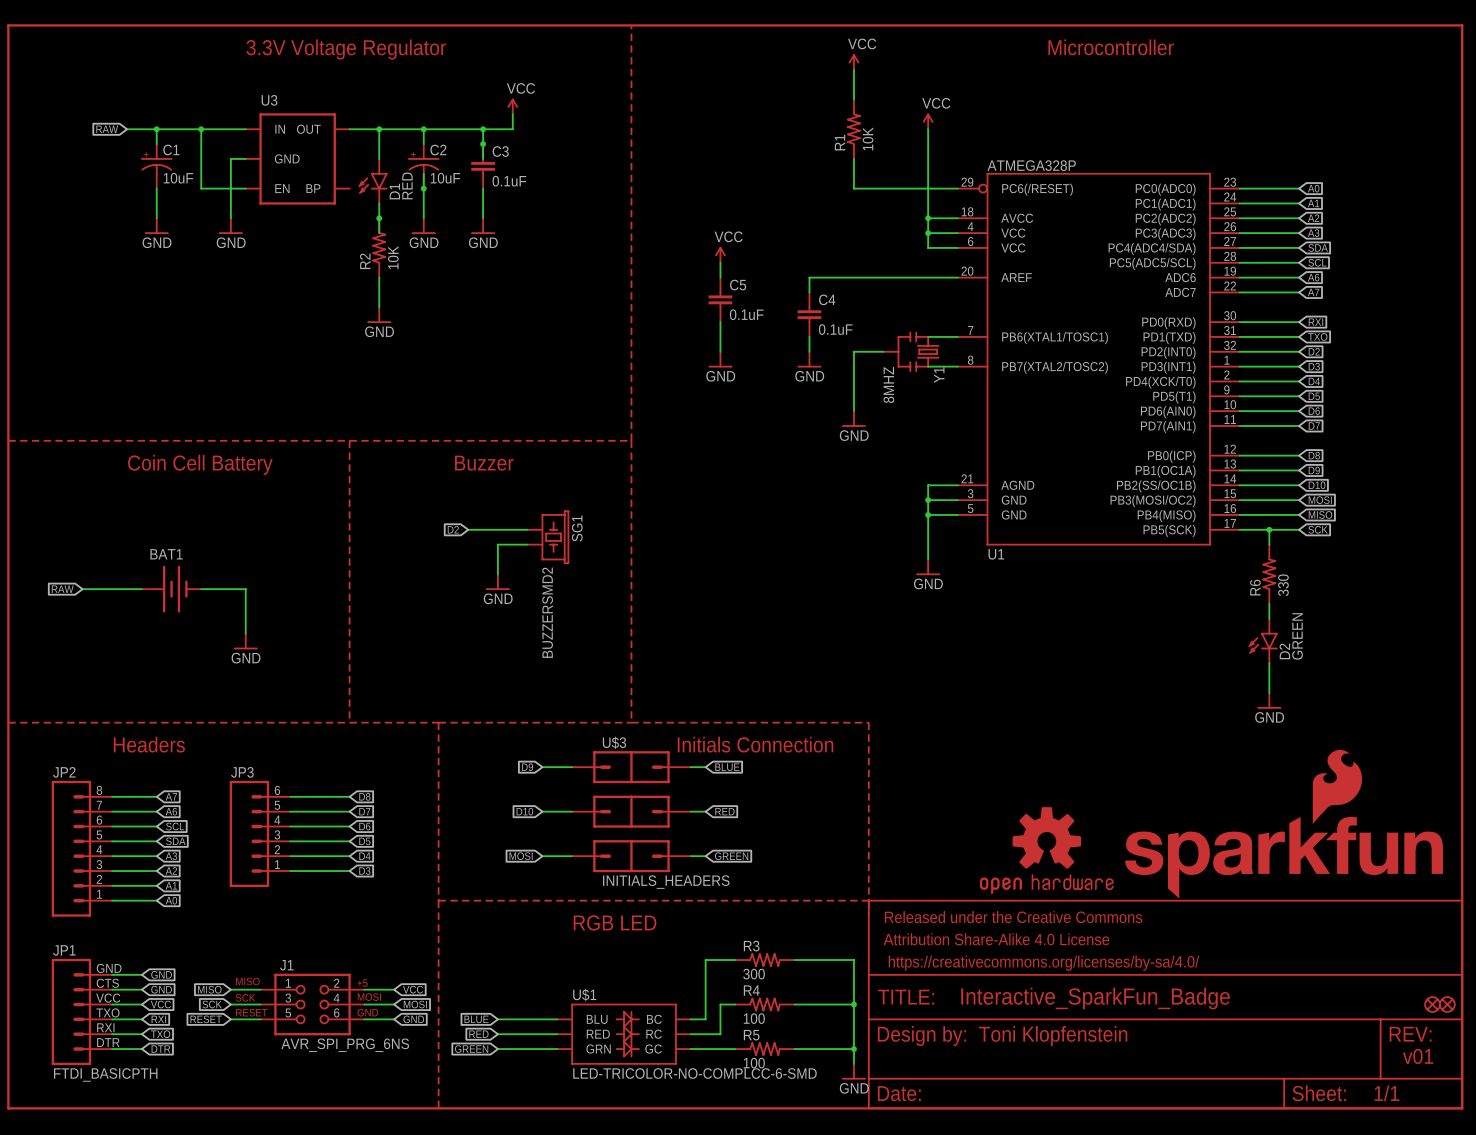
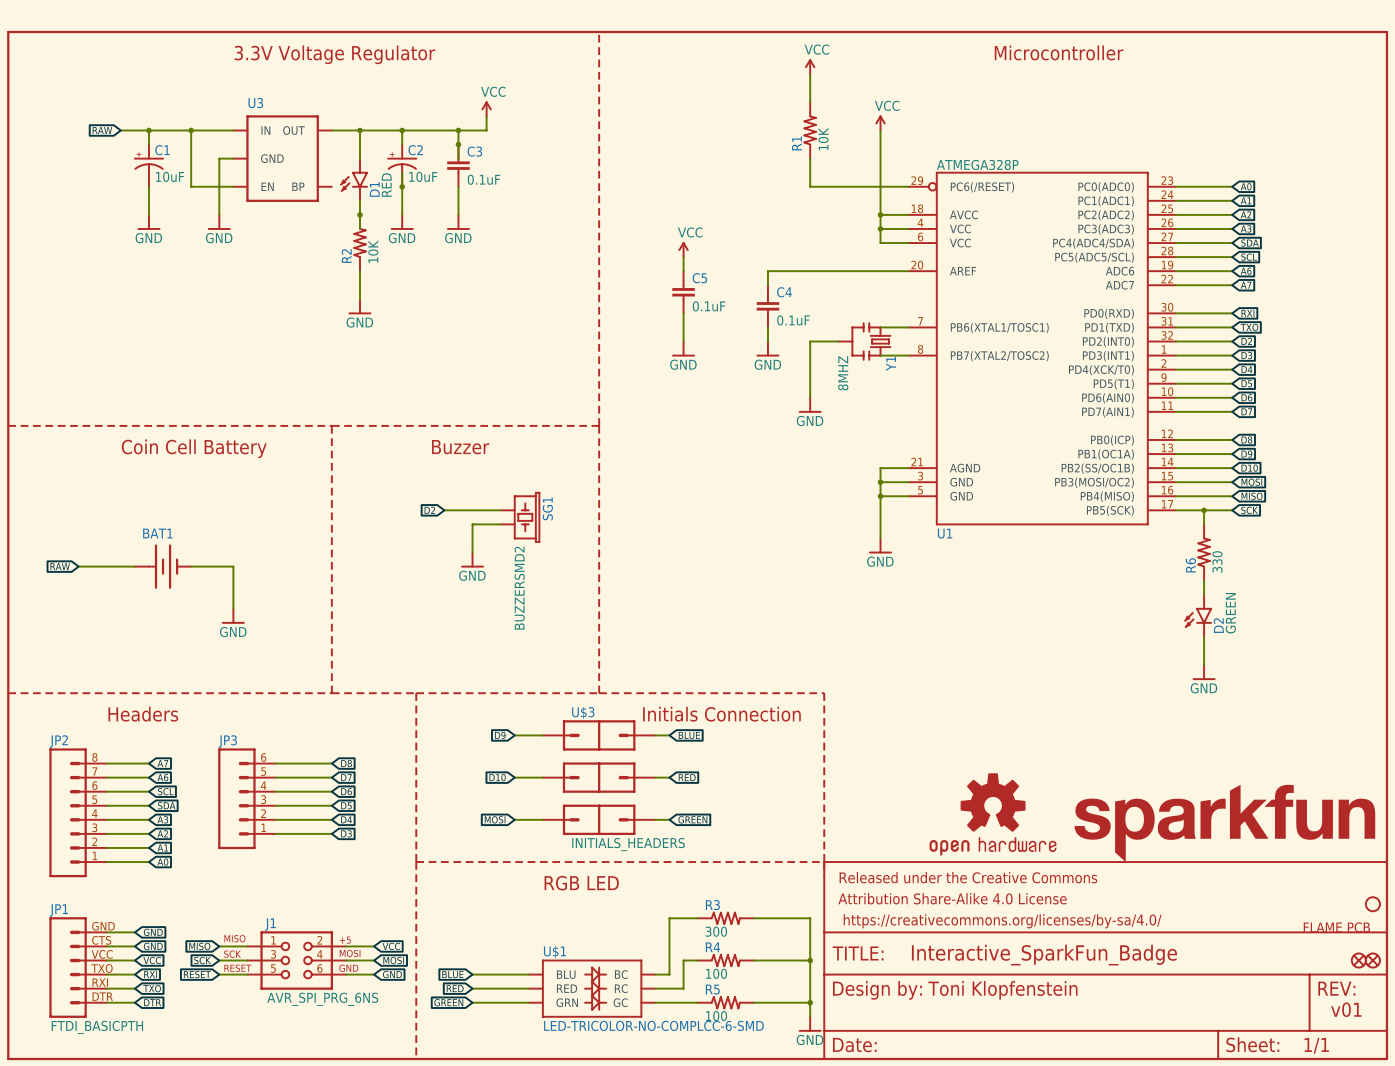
part: (1284, 824) -> none
part: none -> (1224, 823)
part: none -> (1372, 904)
part: none -> (1336, 927)

